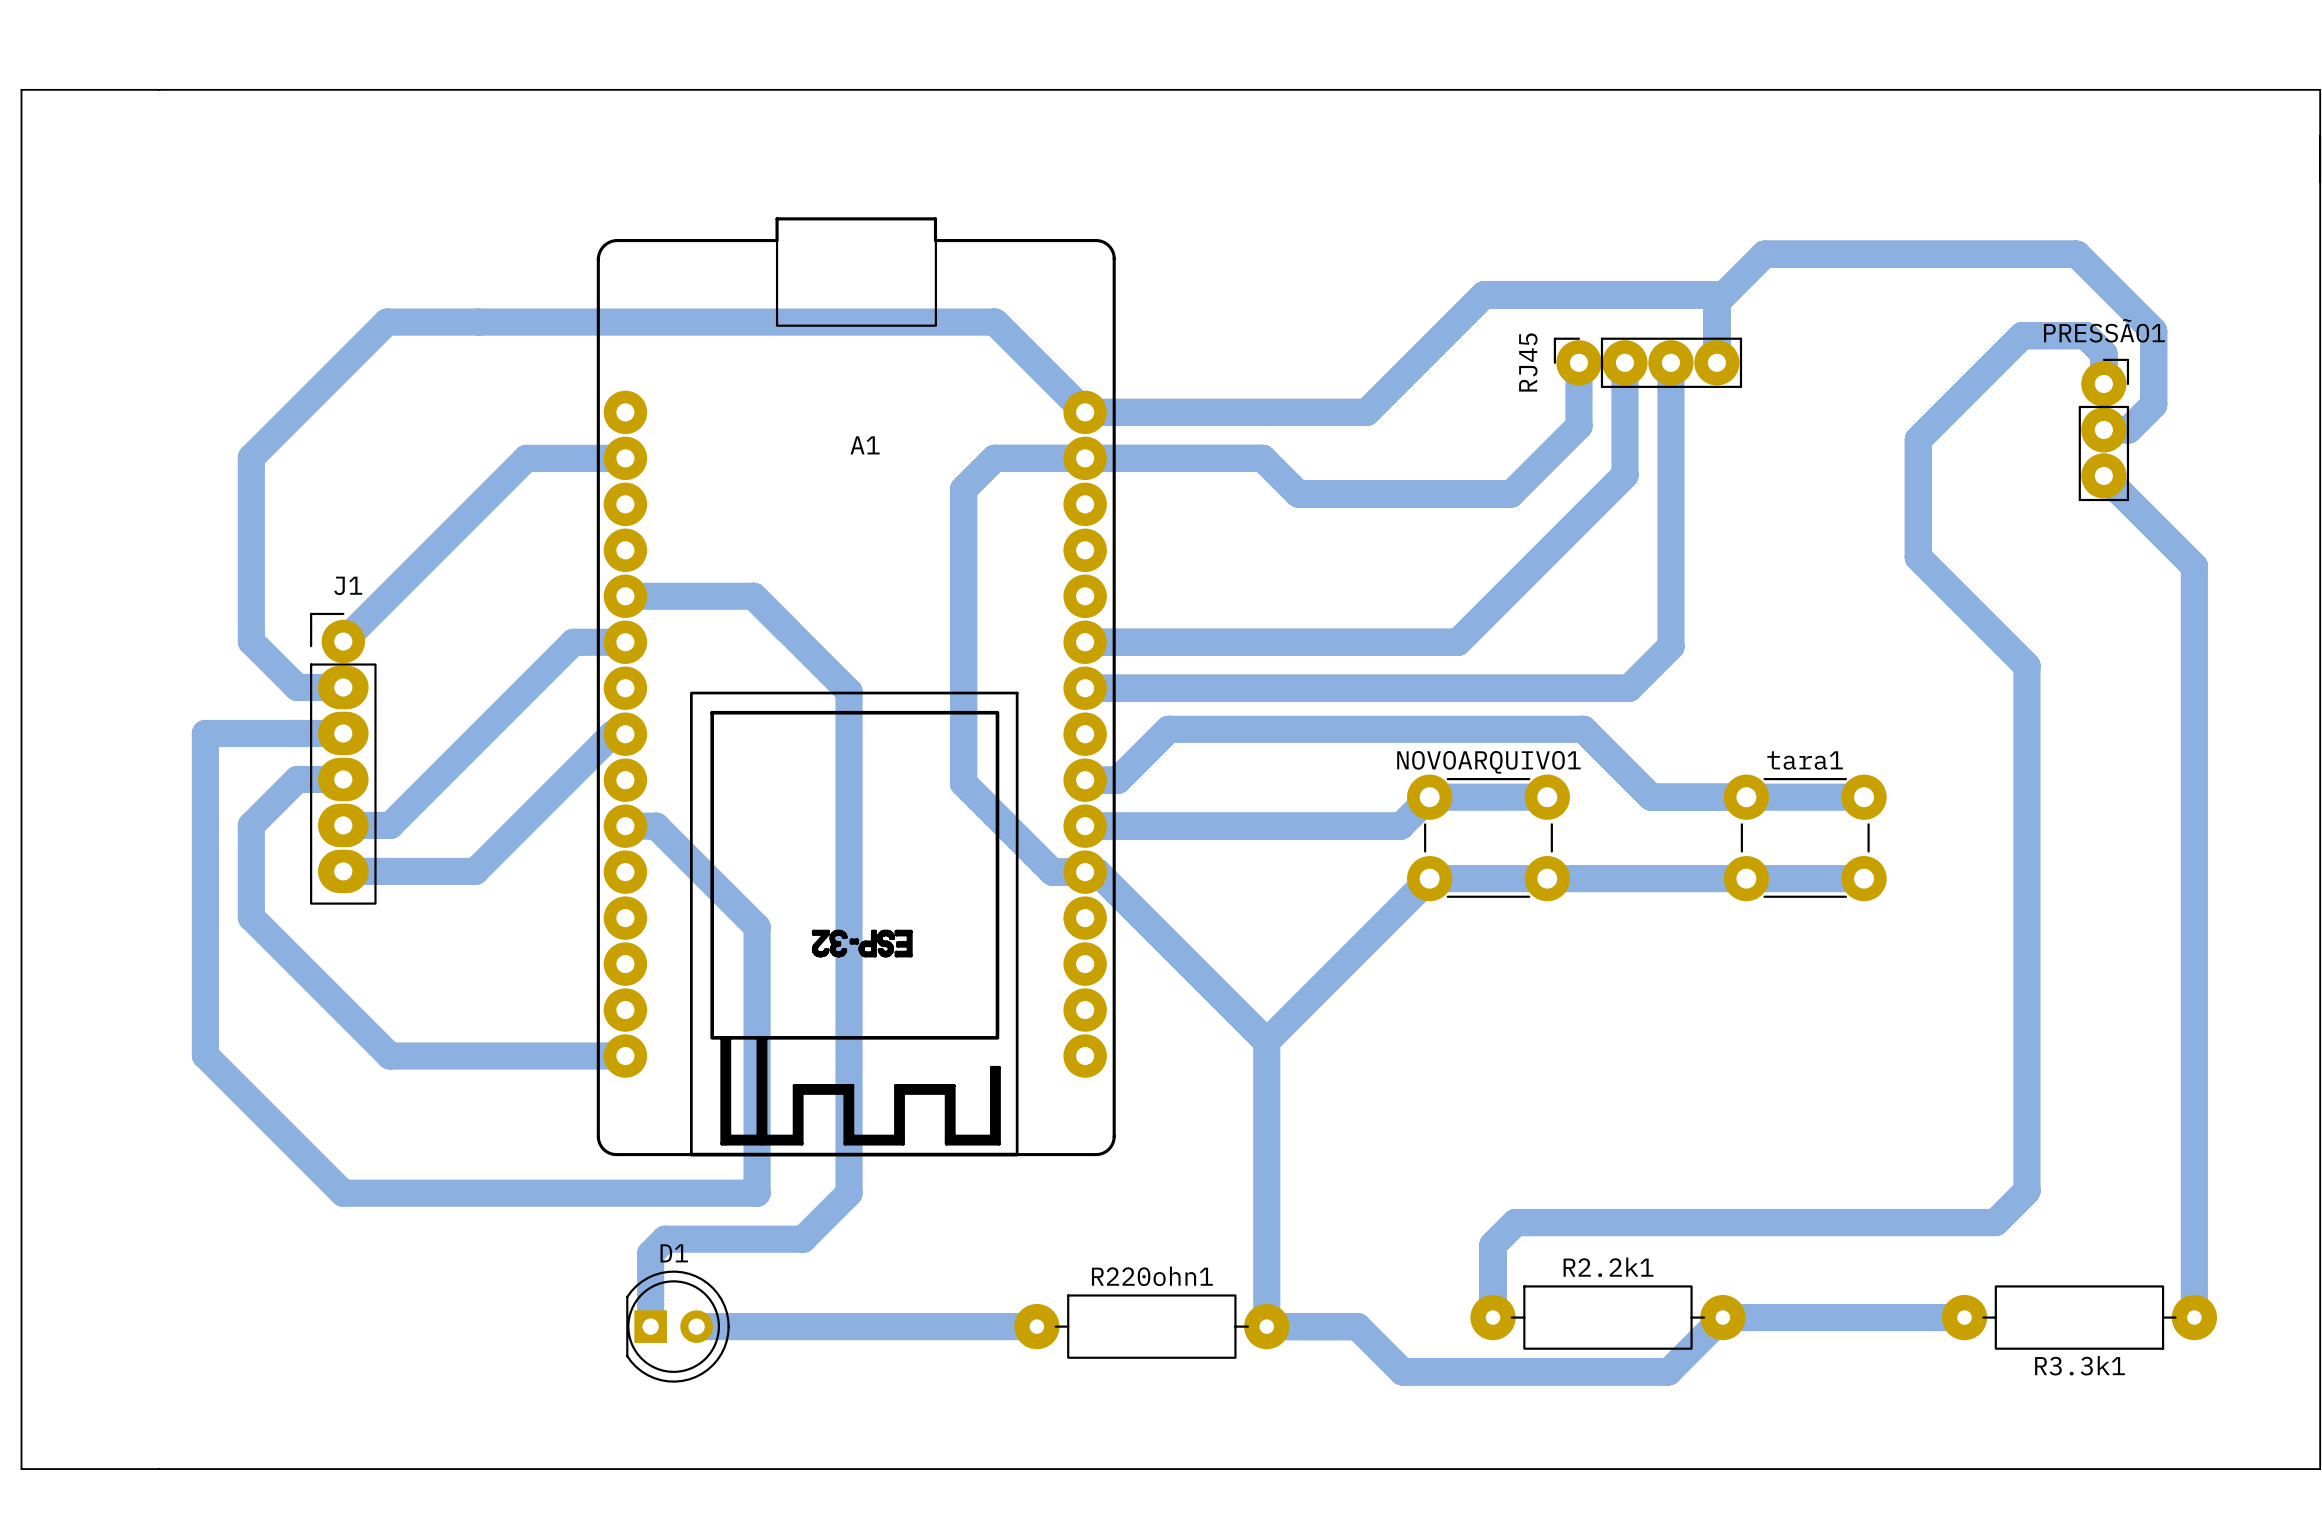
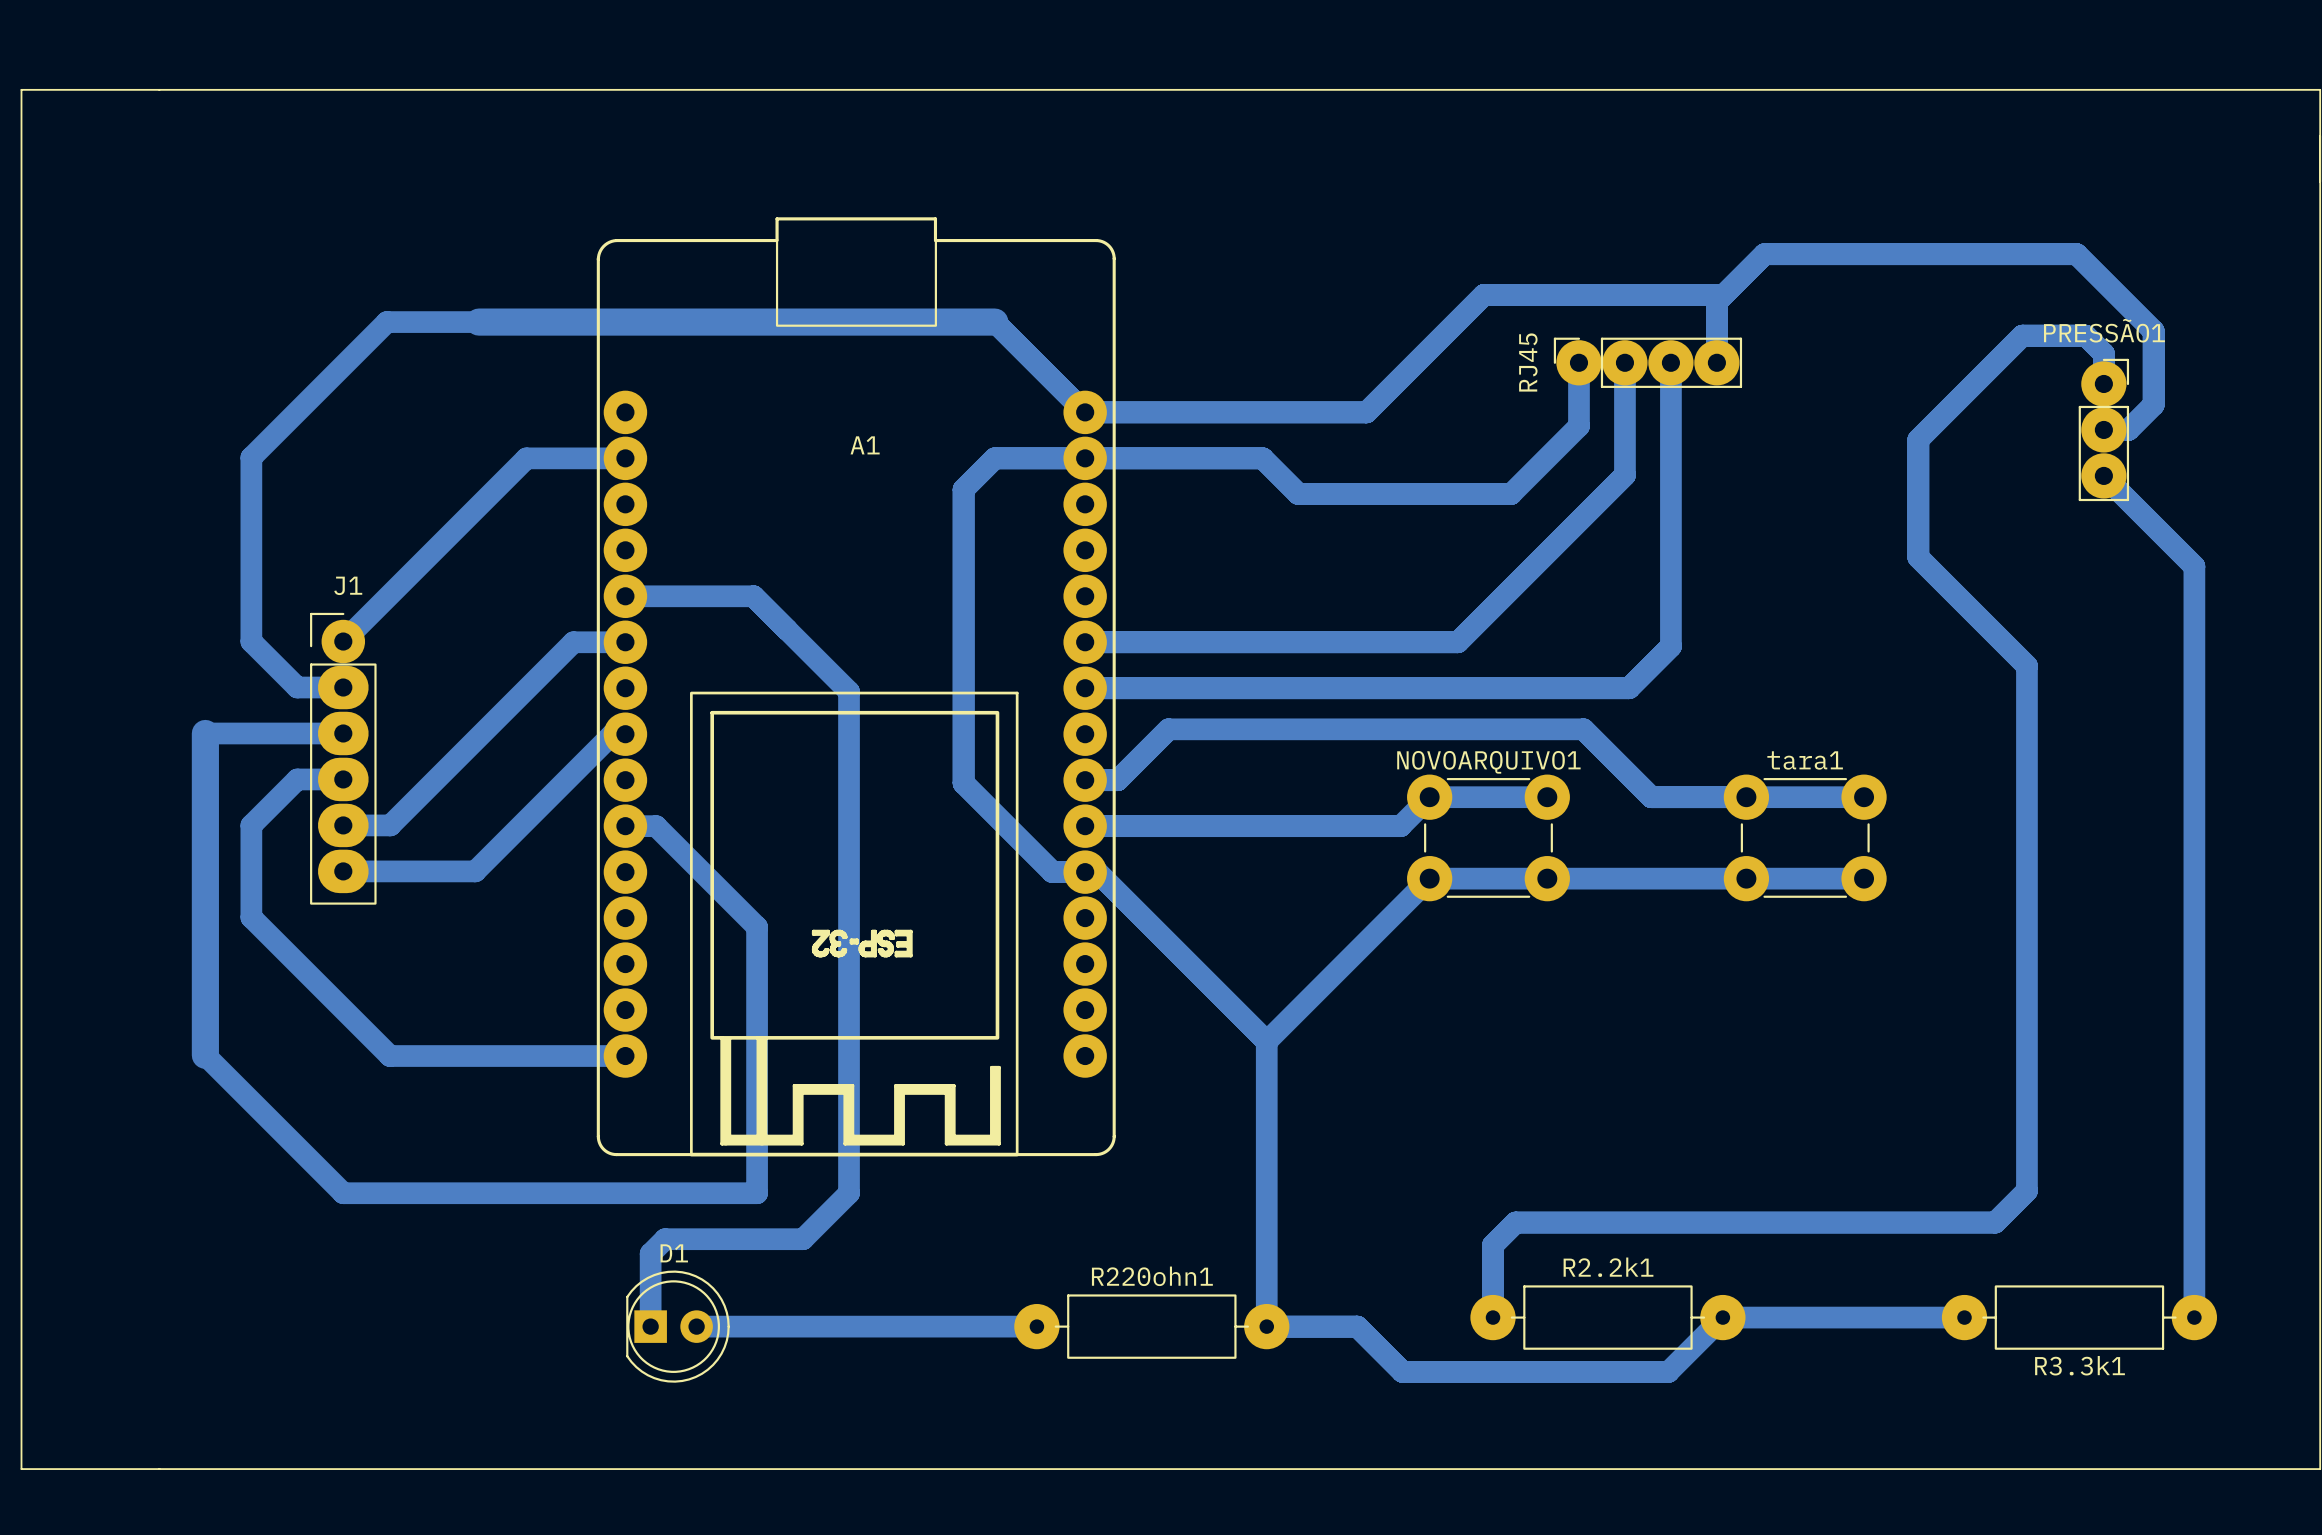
bottom track width: thick (1723, 294) (1483, 294) (1366, 412) (1085, 412) (994, 322) -> thin (1723, 294) (1483, 294) (1366, 412) (1085, 412) (994, 322)
bottom track width: thick (478, 322) (386, 322) (251, 457) (251, 641) (297, 687) (343, 687) -> thin (478, 322) (386, 322) (251, 457) (251, 641) (297, 687) (343, 687)
bottom track width: thick (1578, 362) (1578, 426) (1511, 494) (1298, 494) (1262, 458) (994, 458) (963, 489) (963, 783) (1052, 872) (1097, 872) (1266, 1041) -> thin (1578, 362) (1578, 426) (1511, 494) (1298, 494) (1262, 458) (994, 458) (963, 489) (963, 783) (1052, 872) (1097, 872) (1266, 1041)
bottom track width: thick (1624, 362) (1624, 475) (1457, 642) (1085, 642) -> thin (1624, 362) (1624, 475) (1457, 642) (1085, 642)
bottom track width: thick (1670, 362) (1670, 646) (1629, 688) (1085, 688) -> thin (1670, 362) (1670, 646) (1629, 688) (1085, 688)
bottom track width: thick (1716, 362) (1716, 301) (1764, 254) (2076, 254) (2153, 331) (2153, 404) (2128, 429) (2103, 429) -> thin (1716, 362) (1716, 301) (1764, 254) (2076, 254) (2153, 331) (2153, 404) (2128, 429) (2103, 429)
bottom track width: thick (2103, 383) (2103, 353) (2085, 335) (2022, 335) (1918, 439) (1918, 557) (2026, 665) (2026, 1190) (1995, 1222) (1515, 1222) (1493, 1245) (1493, 1317) -> thin (2103, 383) (2103, 353) (2085, 335) (2022, 335) (1918, 439) (1918, 557) (2026, 665) (2026, 1190) (1995, 1222) (1515, 1222) (1493, 1245) (1493, 1317)
bottom track width: thick (625, 458) (526, 458) (343, 641) -> thin (625, 458) (526, 458) (343, 641)
bottom track width: thick (2103, 475) (2194, 566) (2194, 1317) -> thin (2103, 475) (2194, 566) (2194, 1317)
bottom track width: thick (625, 596) (753, 596) (849, 691) (849, 1193) (803, 1239) (665, 1239) (650, 1253) (650, 1326) -> thin (625, 596) (753, 596) (849, 691) (849, 1193) (803, 1239) (665, 1239) (650, 1253) (650, 1326)
bottom track width: thick (625, 642) (573, 642) (390, 825) (343, 825) -> thin (625, 642) (573, 642) (390, 825) (343, 825)
bottom track width: thick (205, 733) (343, 733) -> thin (205, 733) (343, 733)
bottom track width: thick (625, 734) (612, 734) (475, 871) (343, 871) -> thin (625, 734) (612, 734) (475, 871) (343, 871)
bottom track width: thick (343, 779) (297, 779) (251, 825) (251, 917) (390, 1056) (625, 1056) -> thin (343, 779) (297, 779) (251, 825) (251, 917) (390, 1056) (625, 1056)
bottom track width: thick (1085, 780) (1117, 780) (1168, 729) (1583, 729) (1651, 797) (1864, 797) -> thin (1085, 780) (1117, 780) (1168, 729) (1583, 729) (1651, 797) (1864, 797)
bottom track width: thick (1547, 797) (1429, 797) (1400, 826) (1085, 826) -> thin (1547, 797) (1429, 797) (1400, 826) (1085, 826)
bottom track width: thick (625, 826) (656, 826) (757, 927) (757, 1193) (343, 1193) (205, 1055) -> thin (625, 826) (656, 826) (757, 927) (757, 1193) (343, 1193) (205, 1055)
bottom track width: thick (1864, 878) (1429, 878) (1266, 1041) -> thin (1864, 878) (1429, 878) (1266, 1041)
bottom track width: thick (1266, 1041) (1266, 1326) (1357, 1326) (1402, 1371) (1668, 1371) (1722, 1317) (1964, 1317) -> thin (1266, 1041) (1266, 1326) (1357, 1326) (1402, 1371) (1668, 1371) (1722, 1317) (1964, 1317)
bottom track width: thick (696, 1326) (1036, 1326) -> thin (696, 1326) (1036, 1326)

